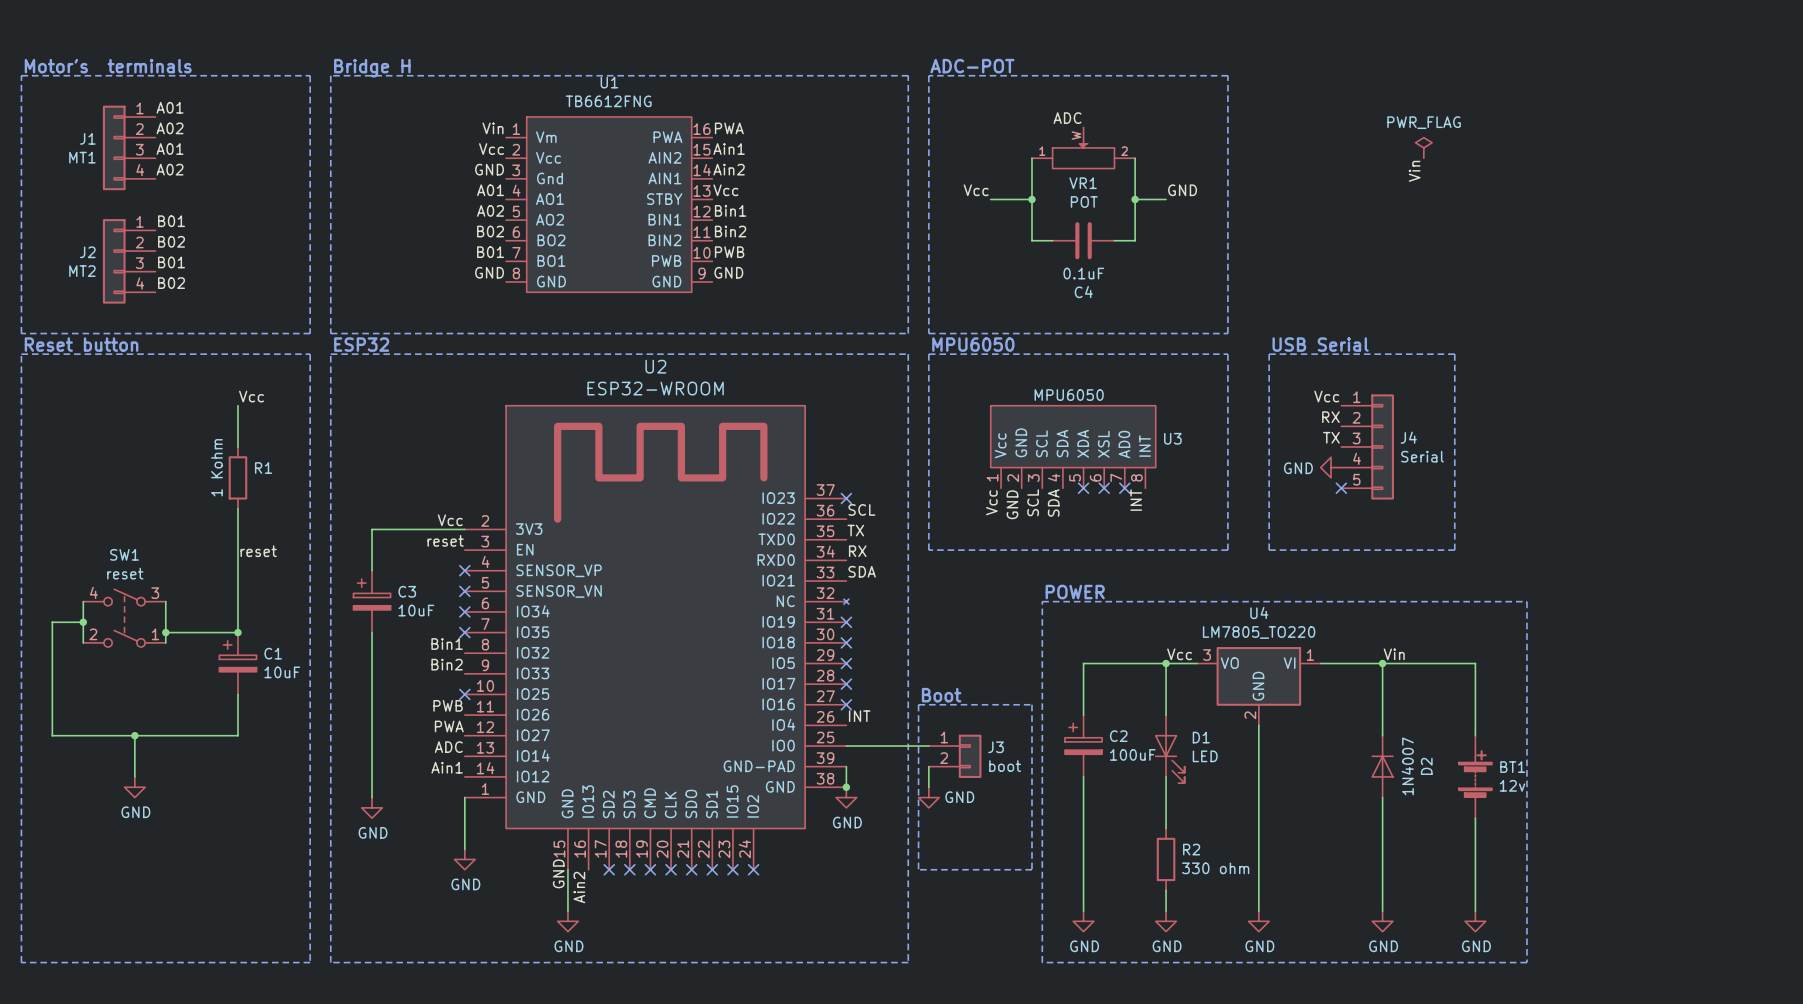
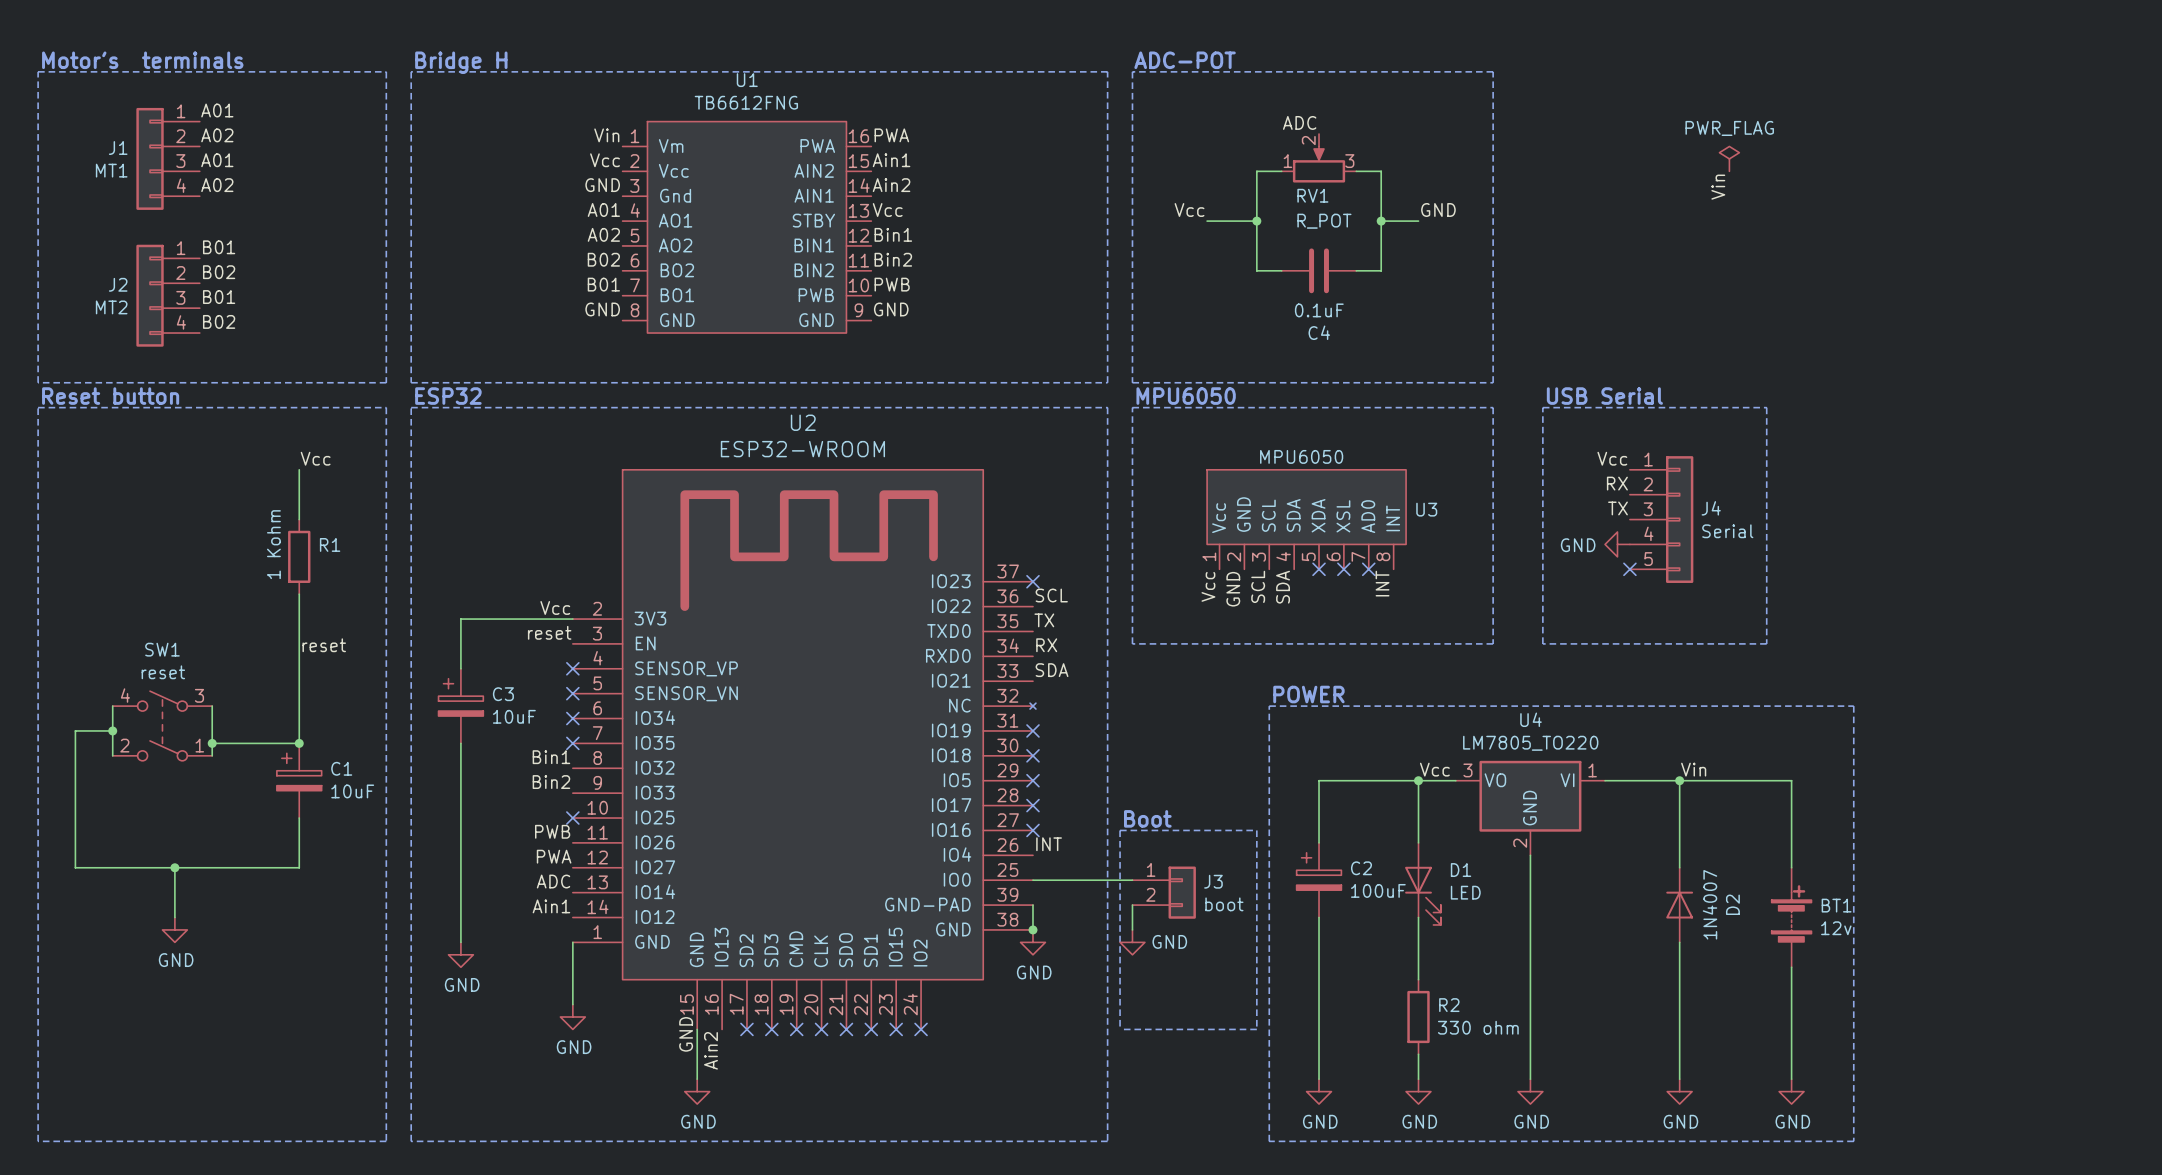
VR1: POT (1083, 147) -> none
RV1: none -> R_POT (1319, 158)

